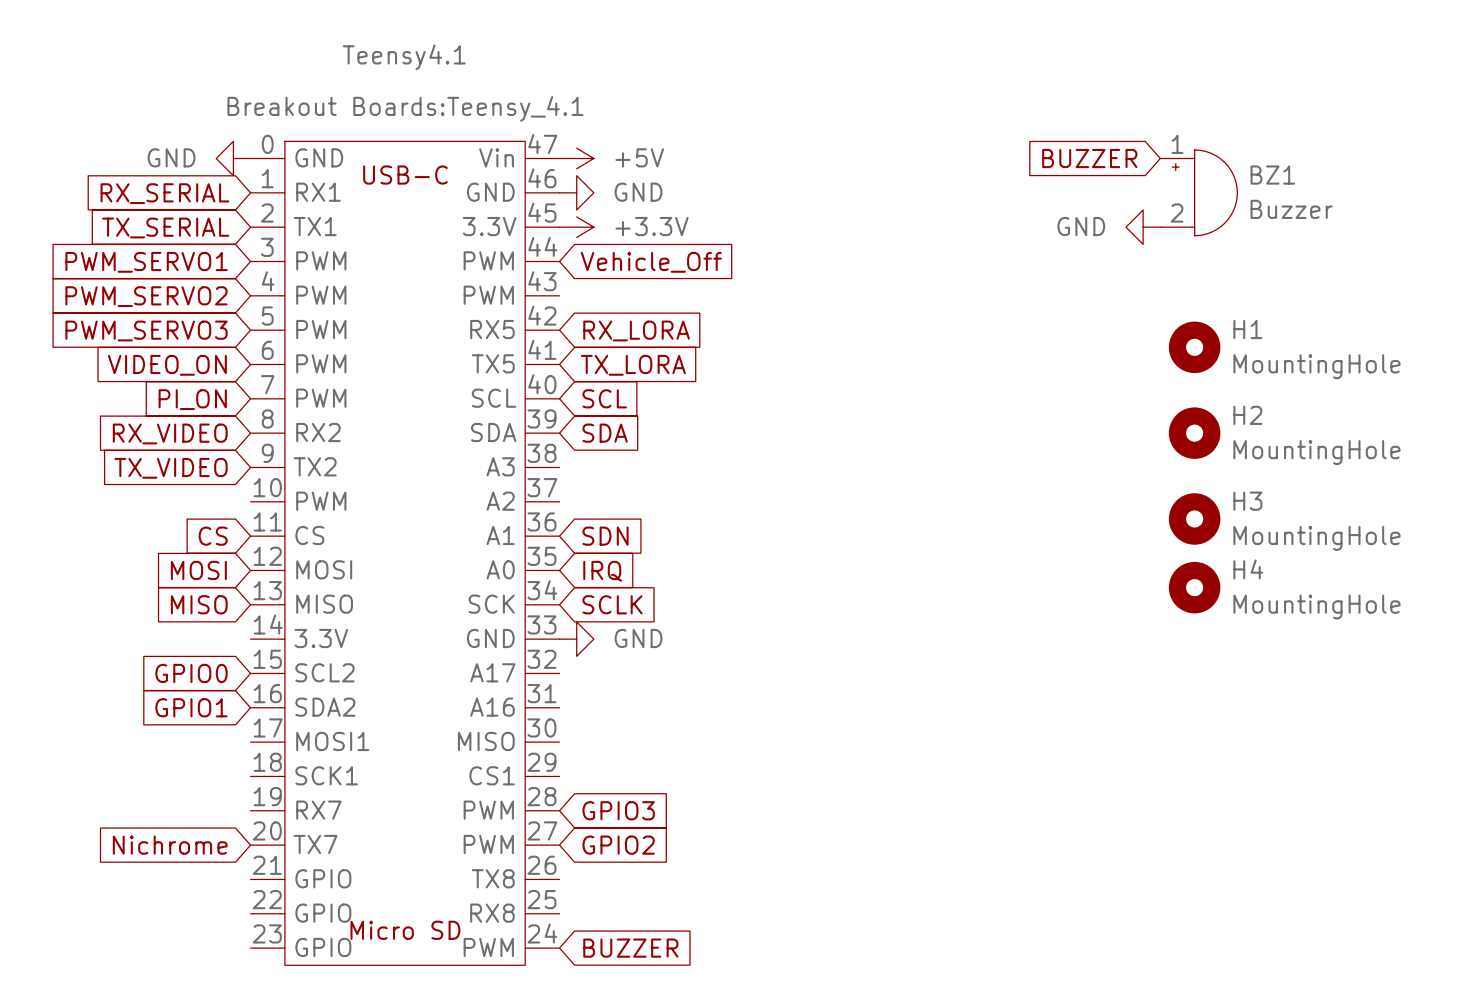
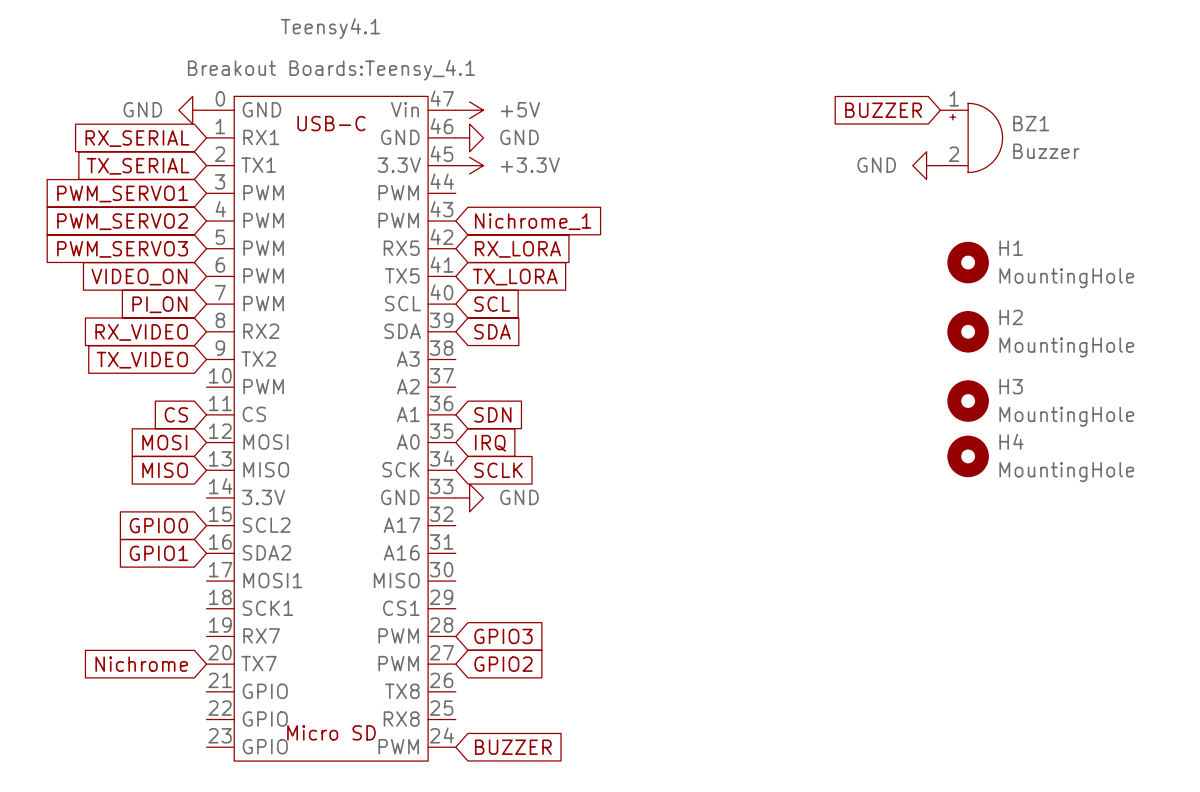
global label: Vehicle_Off (651, 262) -> none
global label: none -> Nichrome_1 (533, 221)

